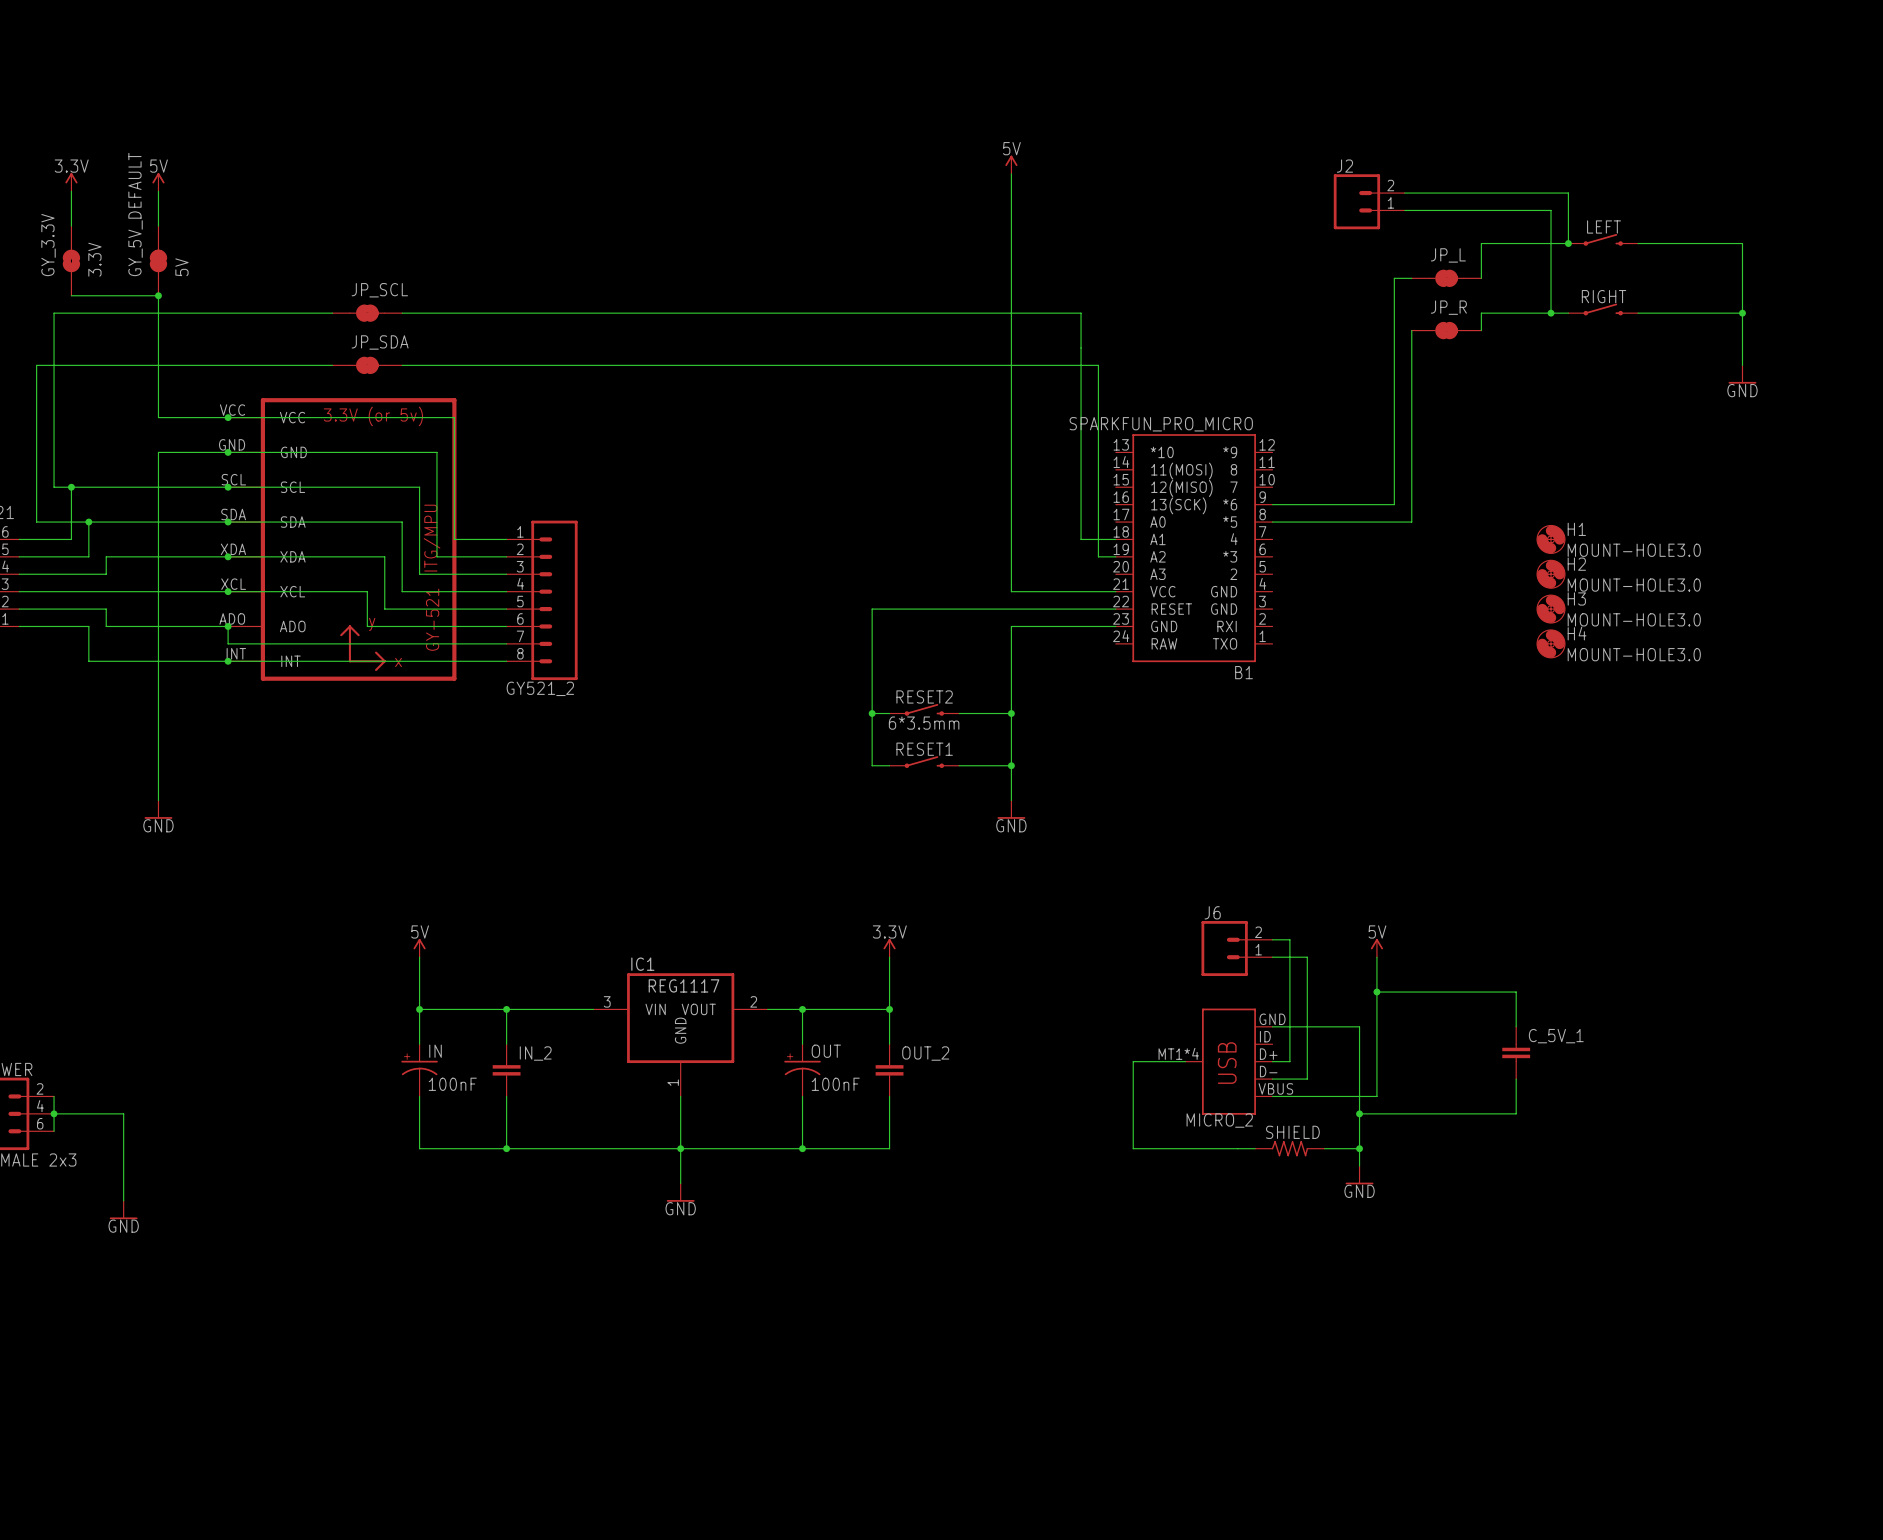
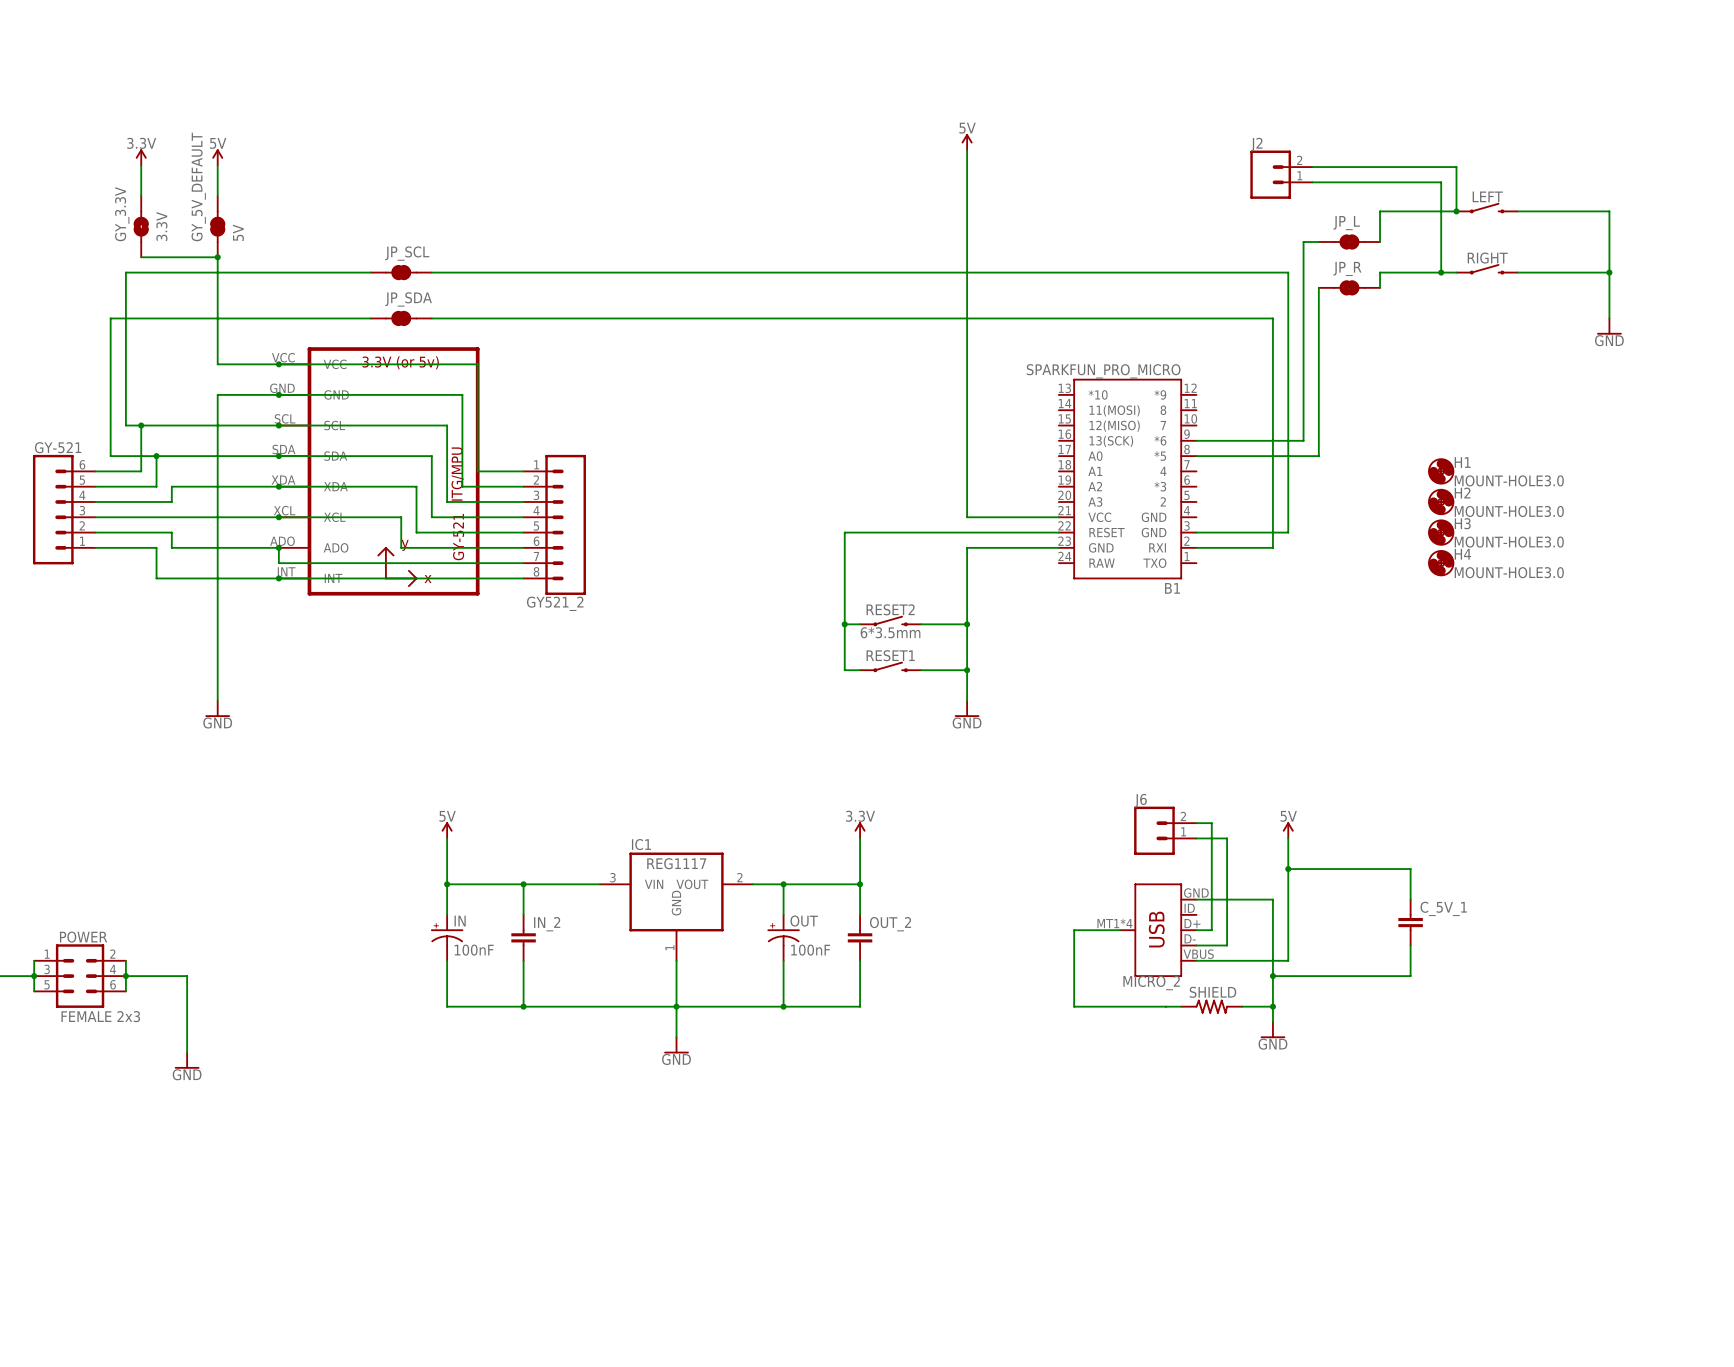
wire: (1081, 313) (1081, 539) (1115, 539) -> (1028, 272) (1288, 272) (1288, 532) (1196, 532)
wire: (1098, 365) (1098, 556) (1115, 556) -> (1043, 318) (1272, 318) (1272, 547) (1196, 547)

